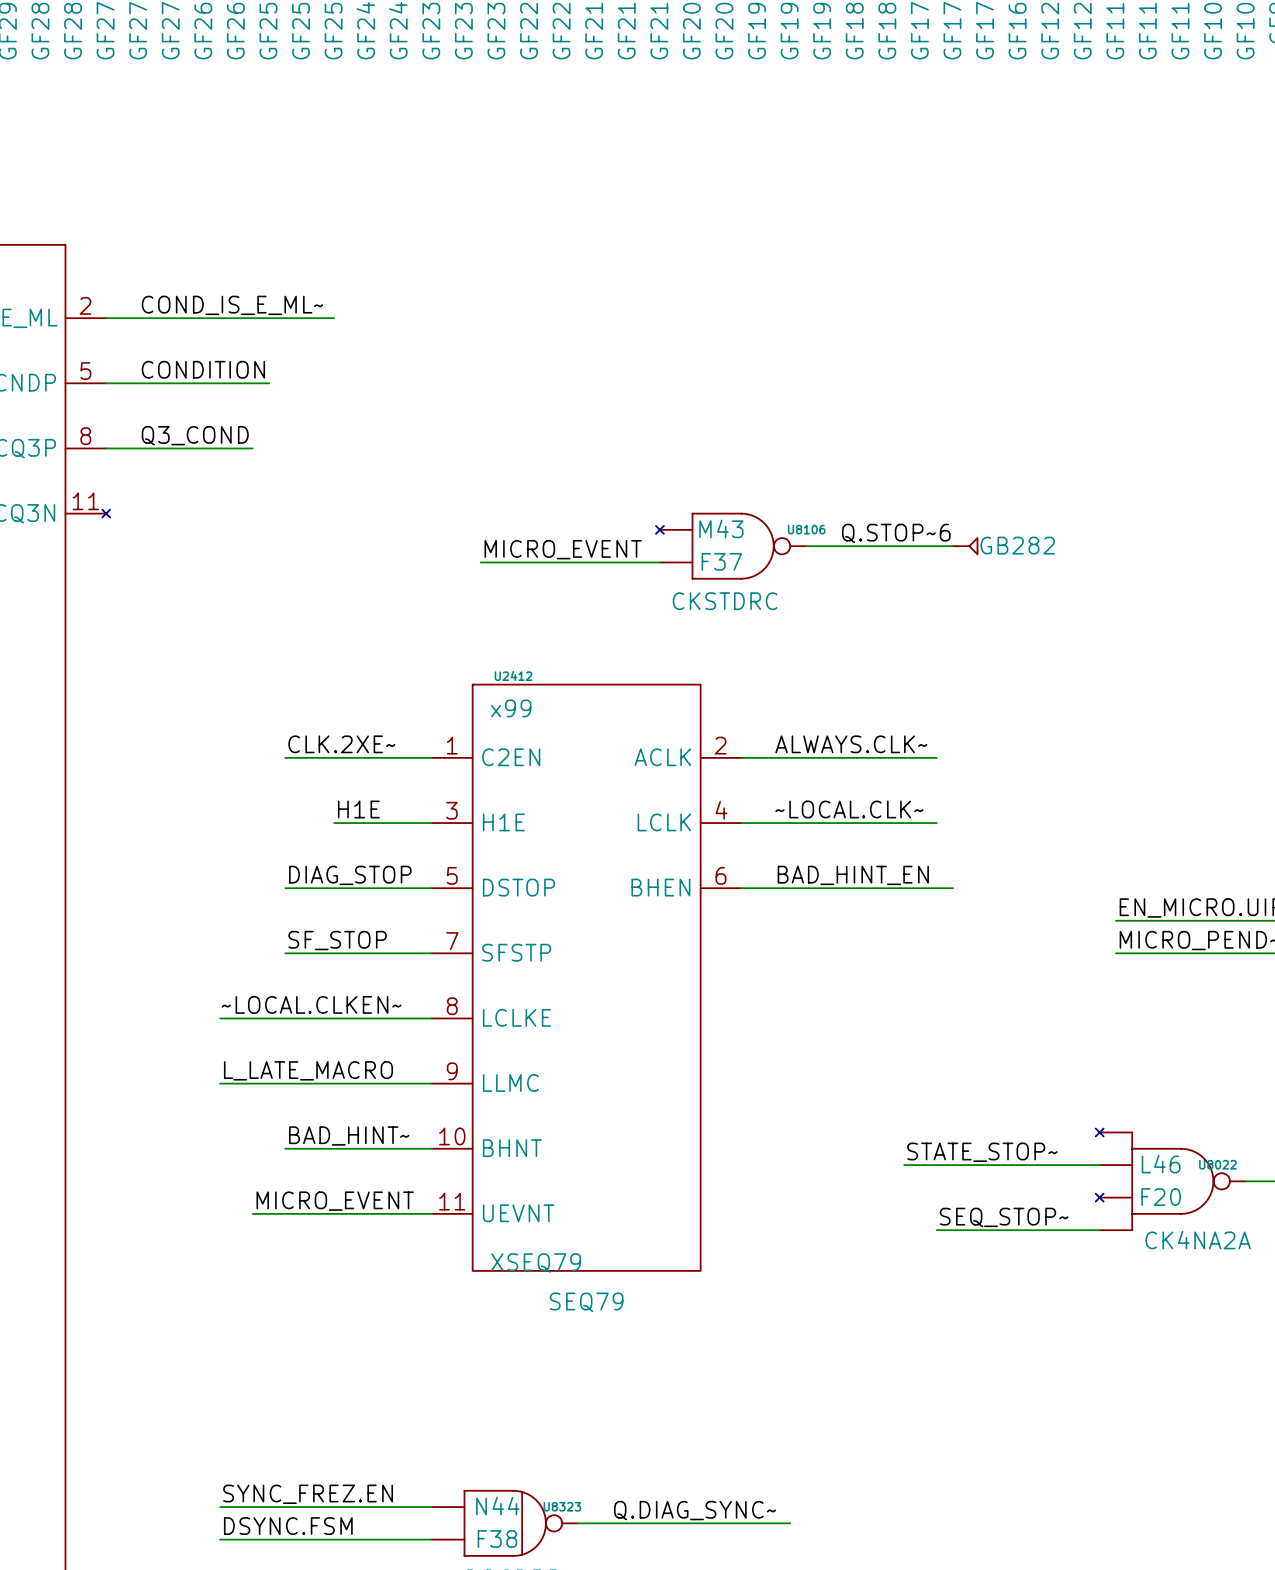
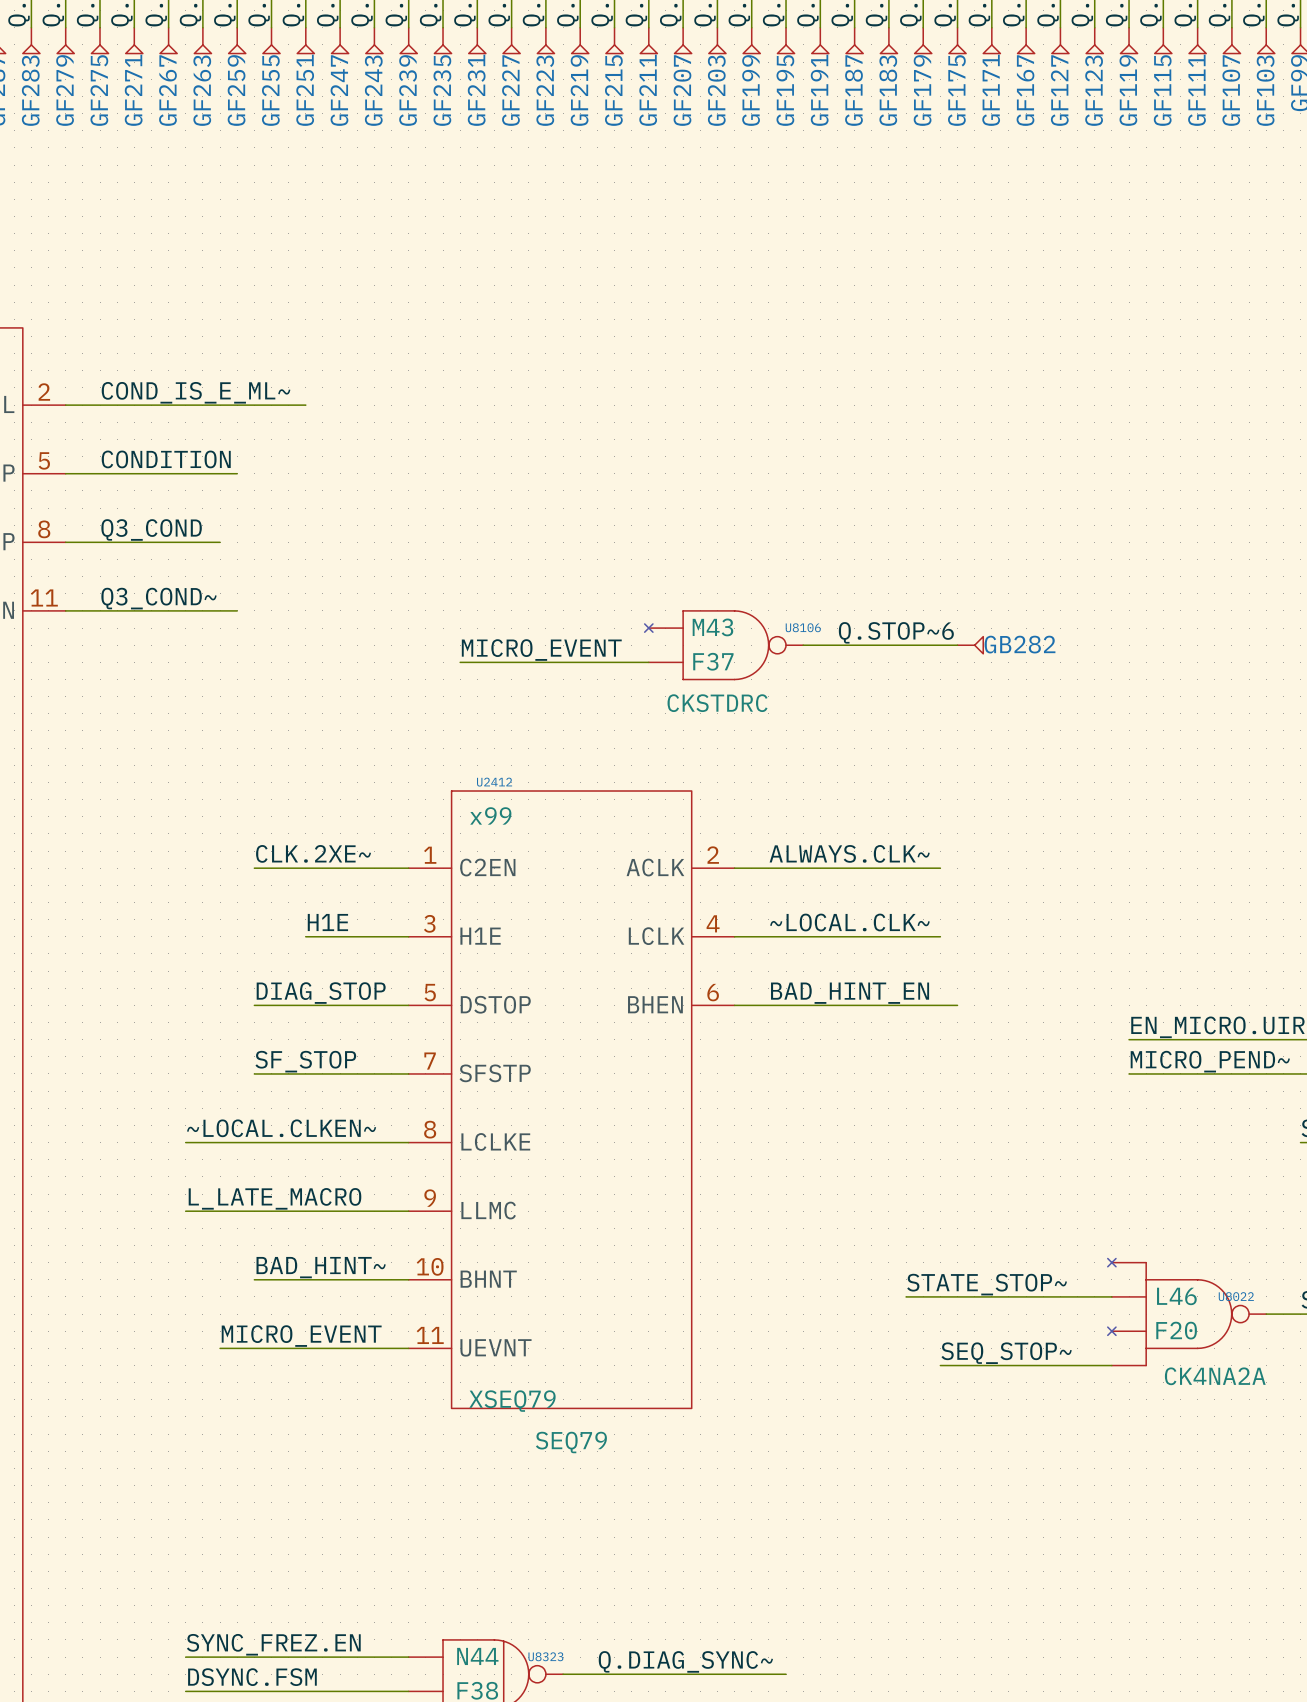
label: none -> Q3_COND~ (159, 598)
wire: none -> (65, 610) (237, 610)
no-connect mark: (106, 513) -> none

